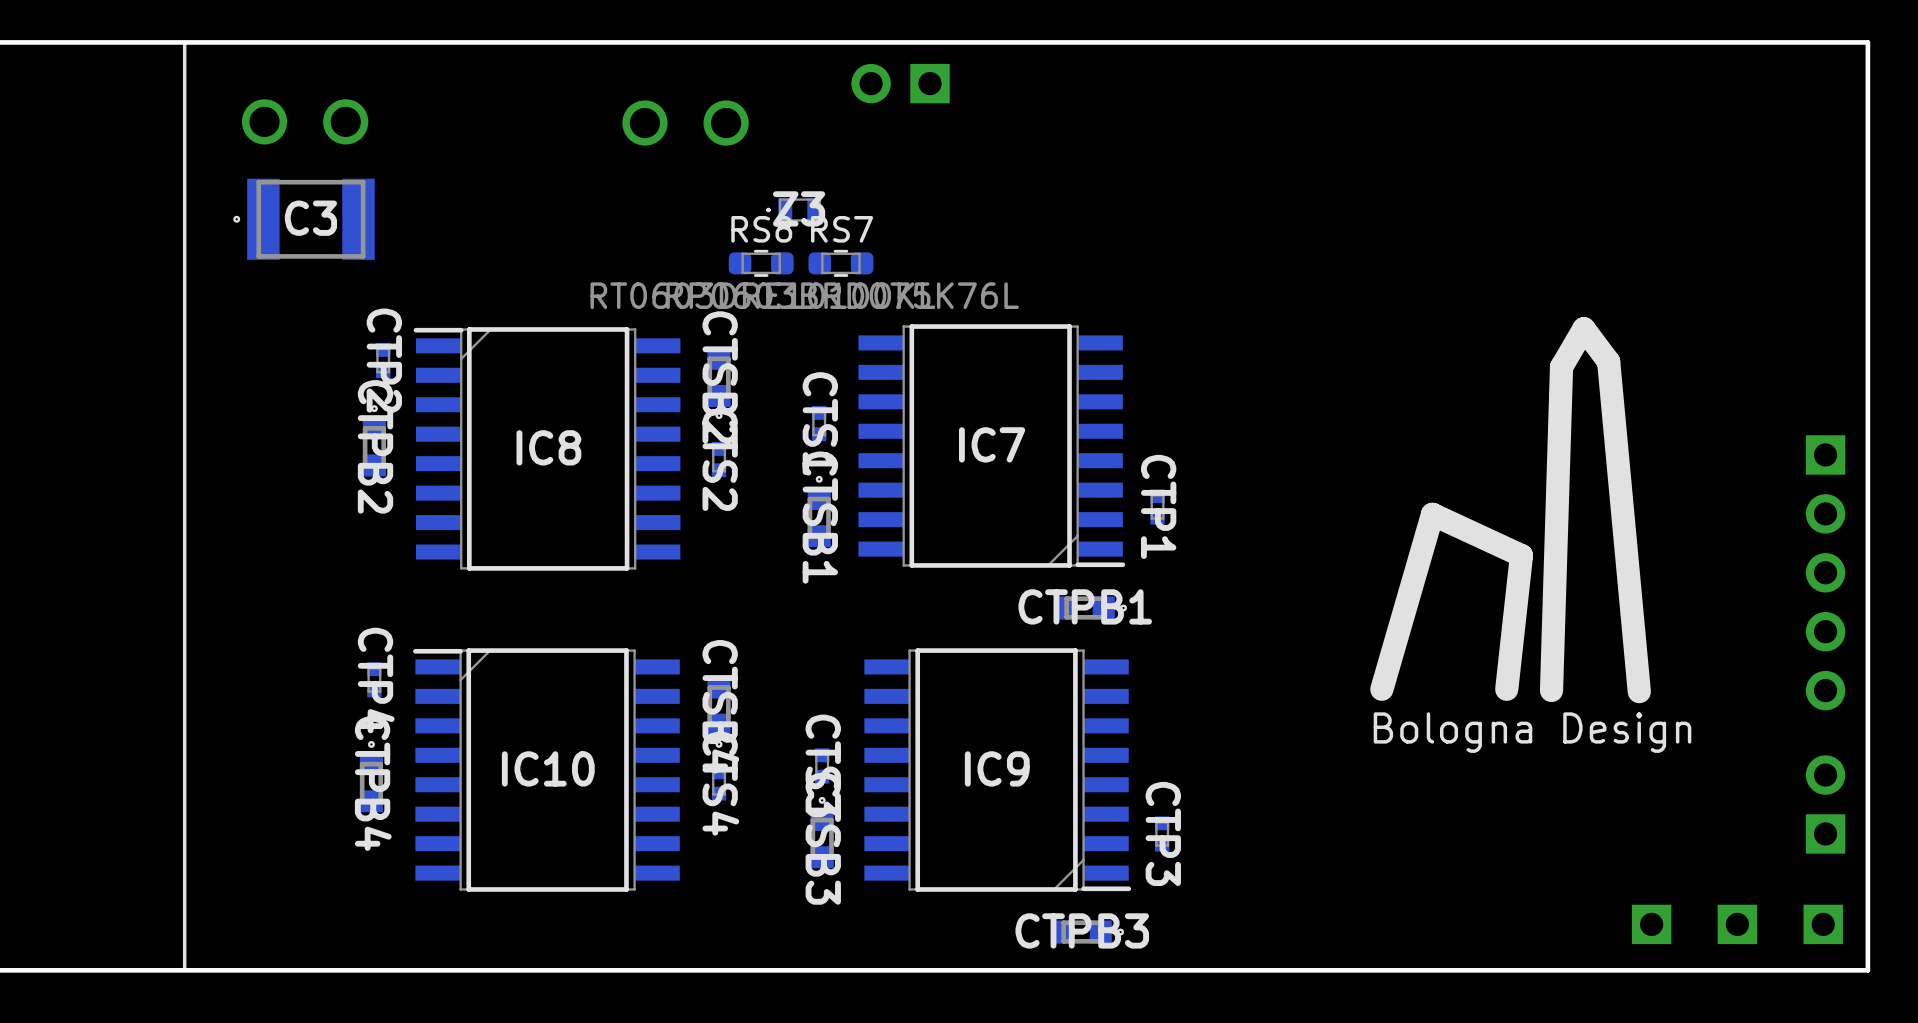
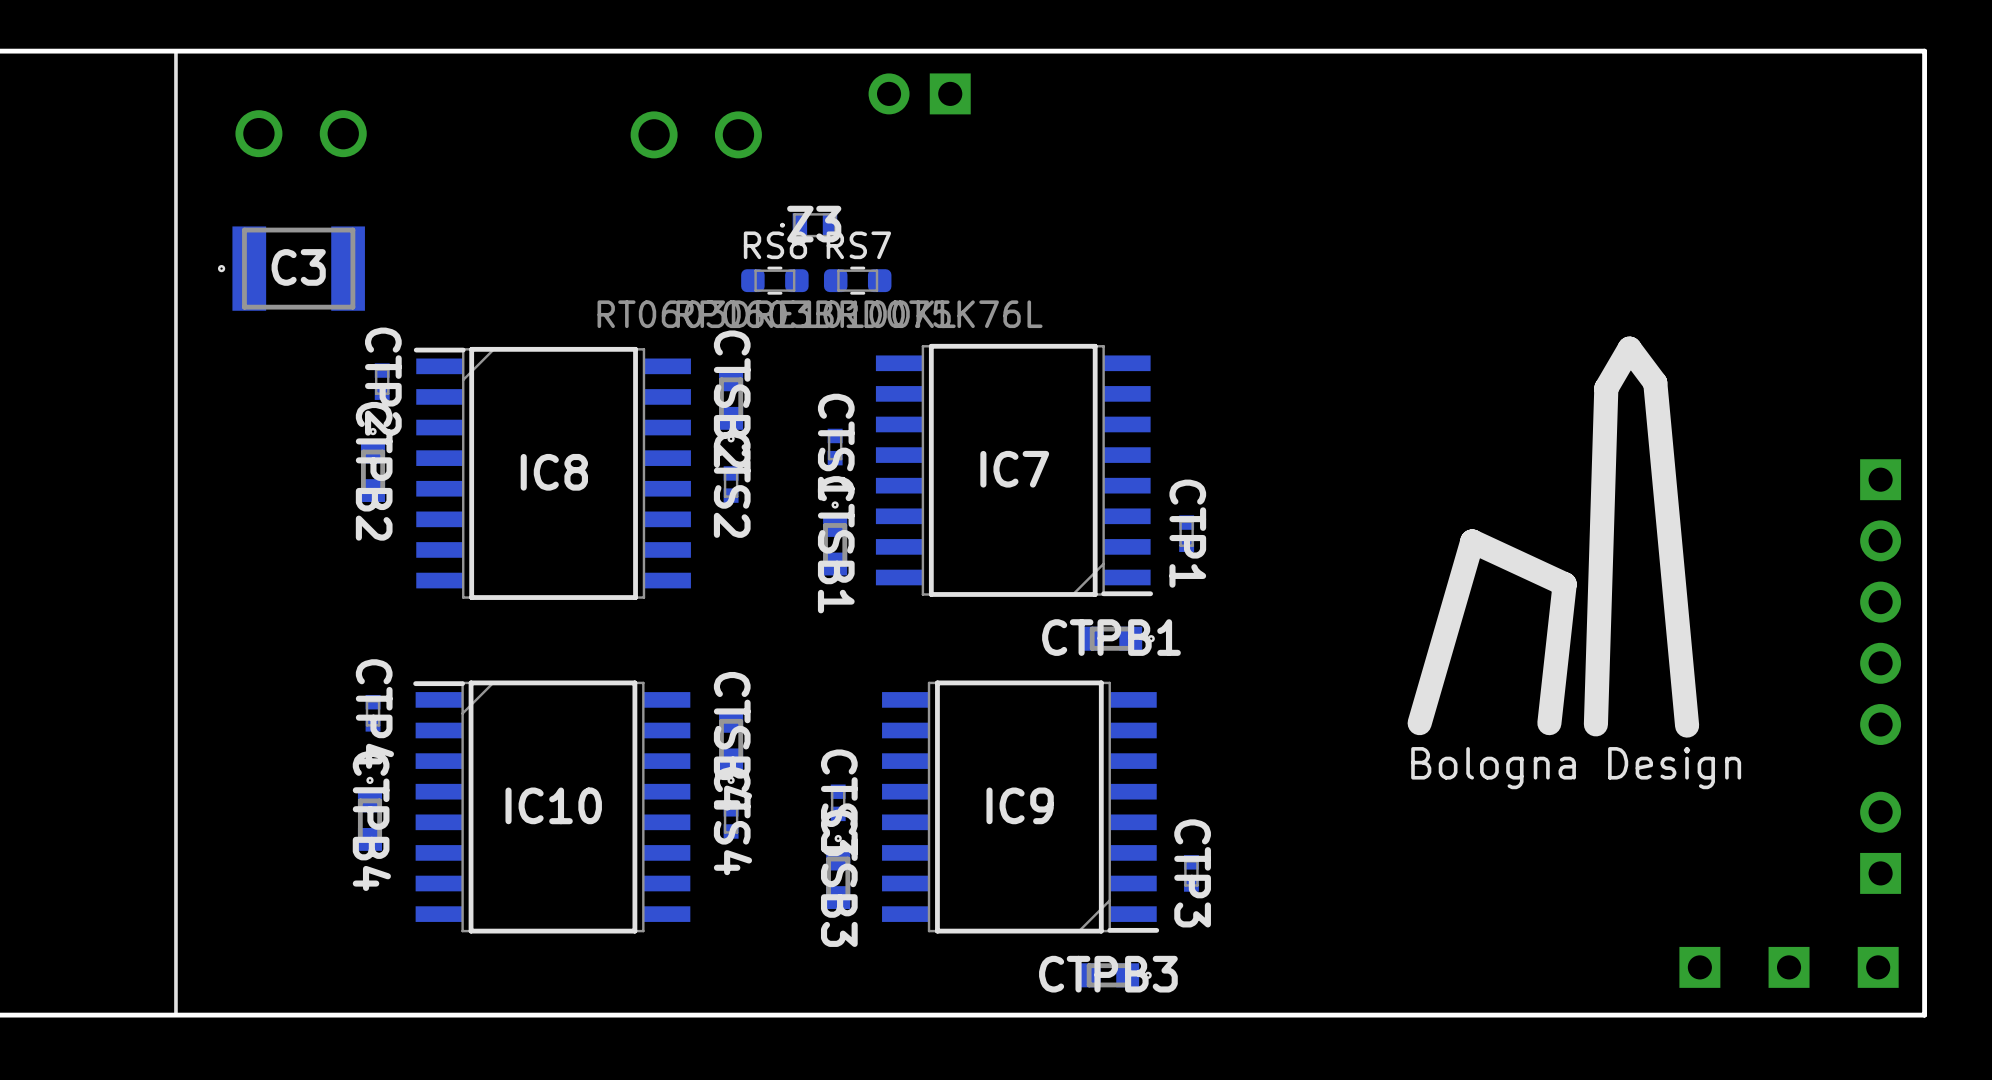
C3 position: (303, 219) -> (291, 268)

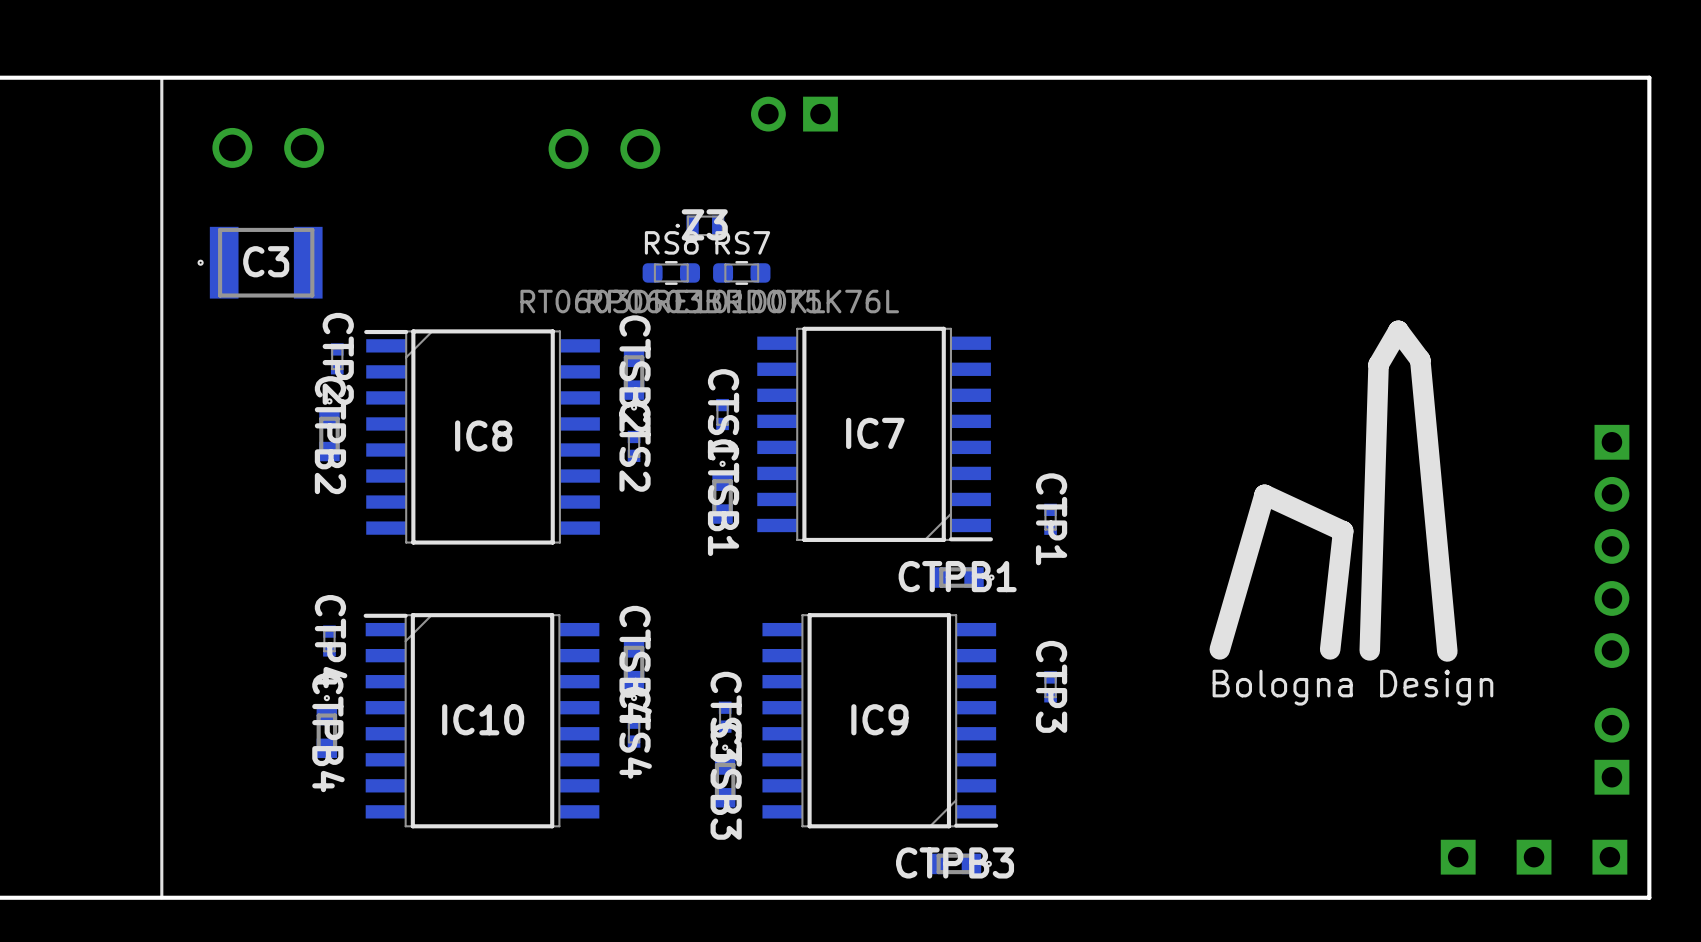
CTP1 position: (1186, 533) -> (1050, 519)
CTP3 position: (1191, 873) -> (1050, 686)

